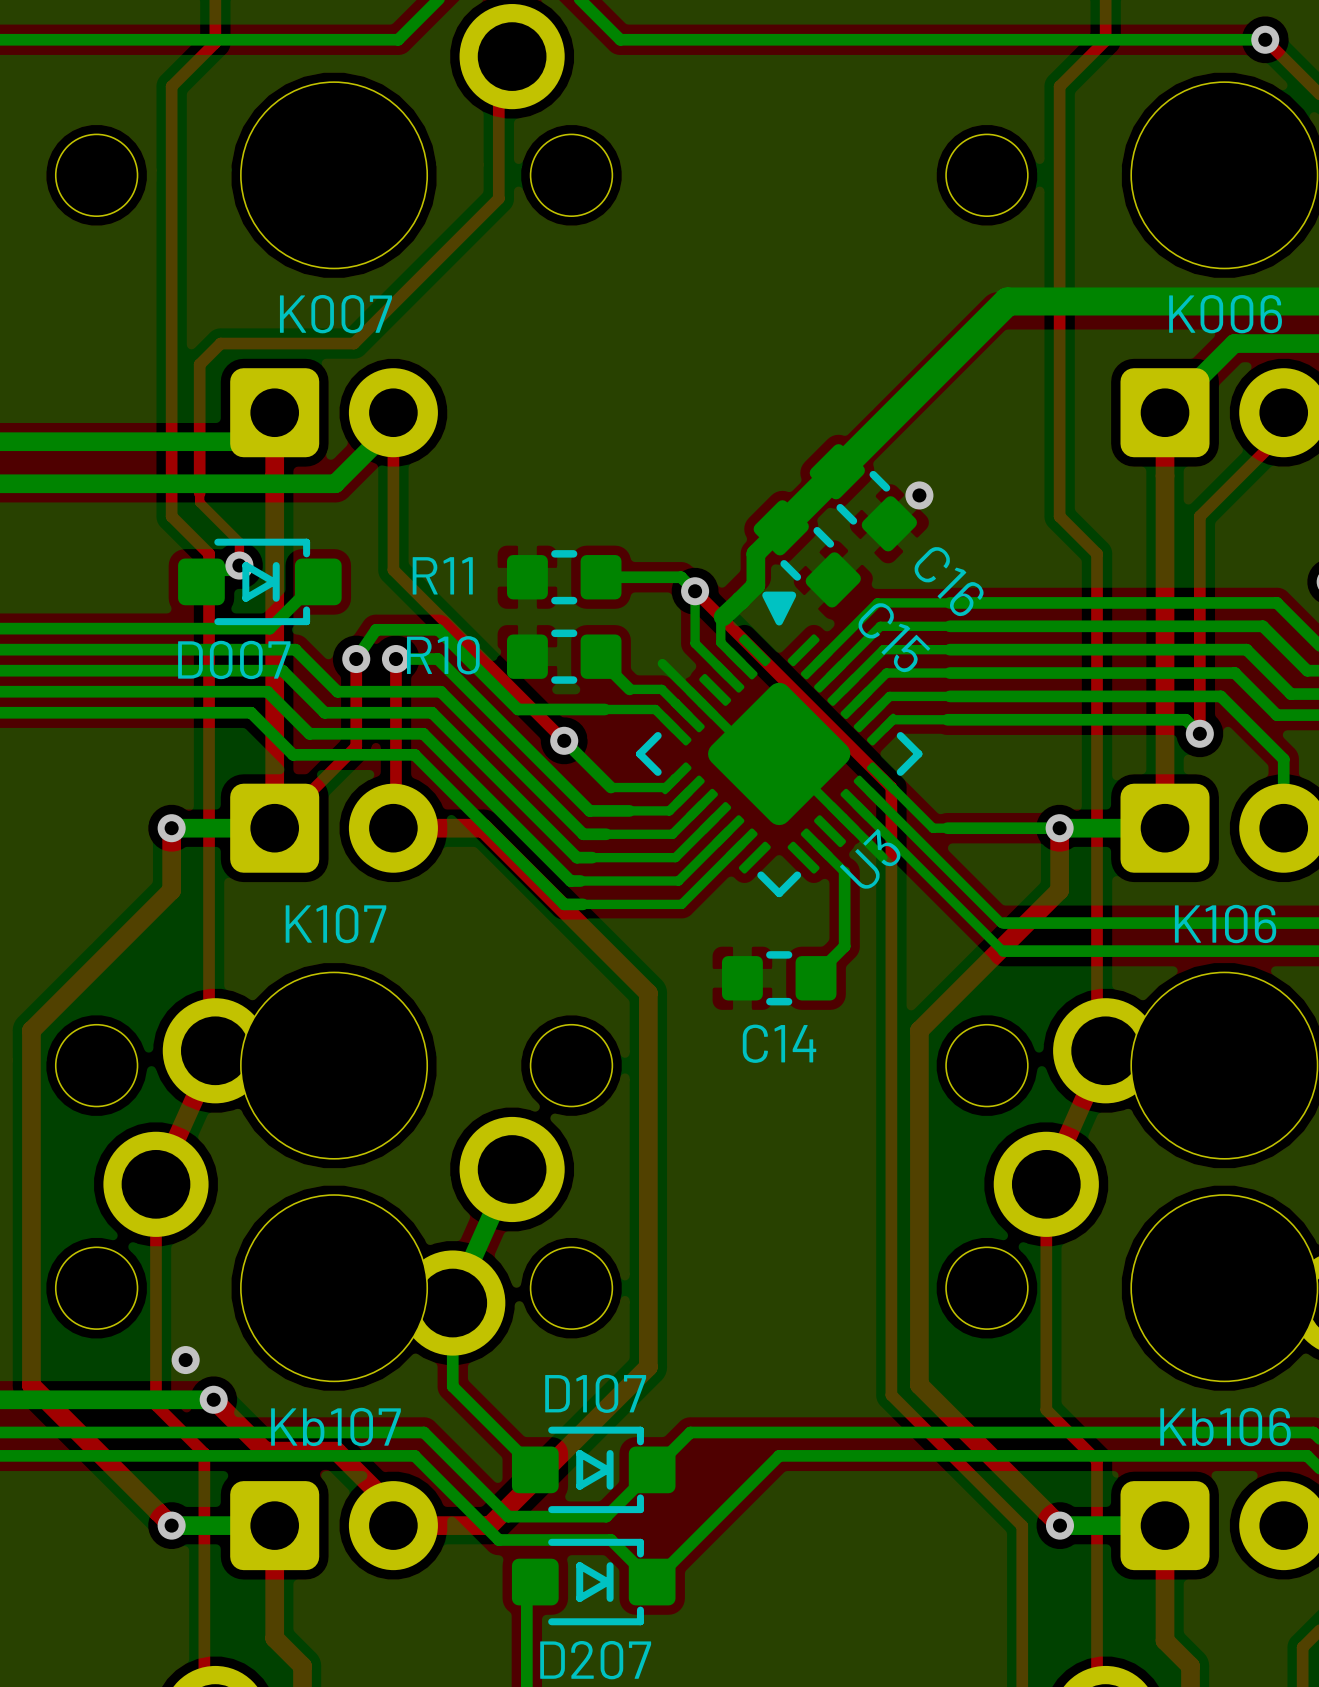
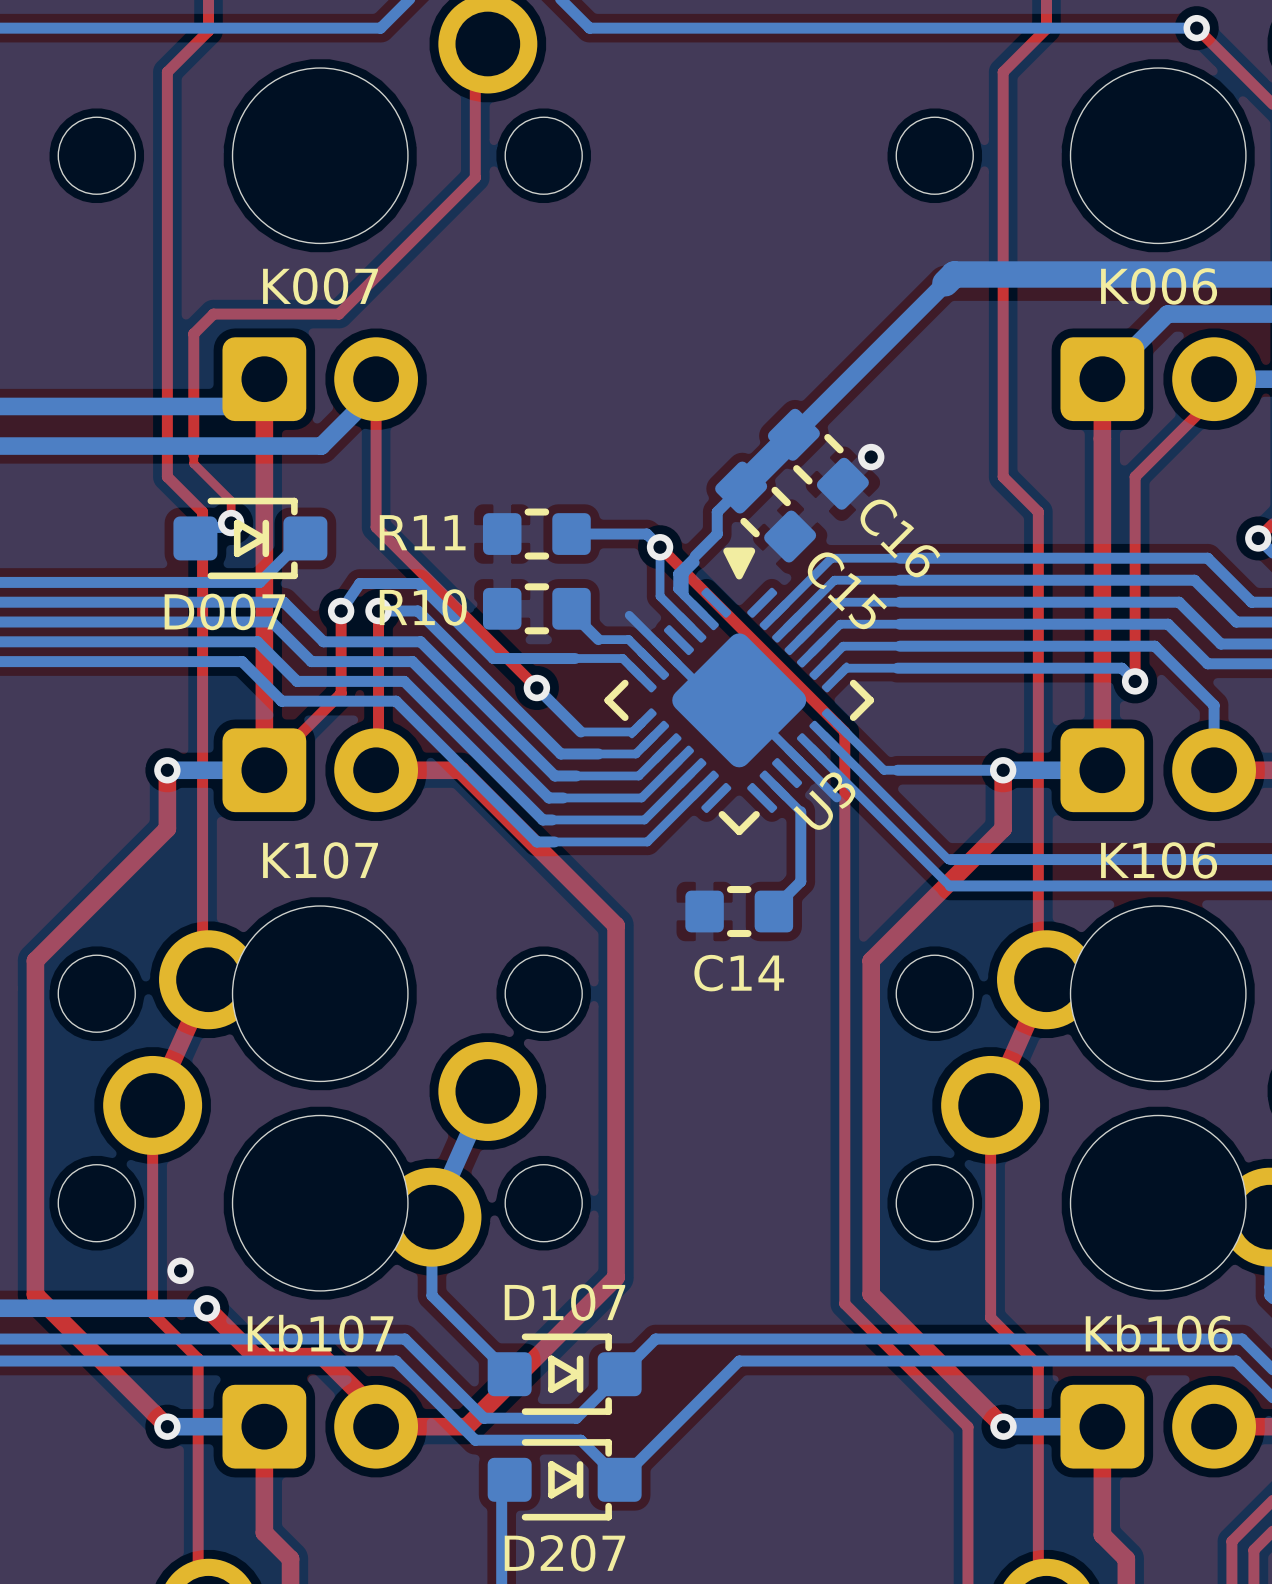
bottom track width: thick (998, 310) (837, 471) -> thin (945, 283) (793, 434)
bottom track width: thick (781, 528) (755, 553) (755, 577) -> thin (741, 488) (717, 512) (717, 534)
bottom track: (755, 577) (755, 585) (723, 616) -> (717, 534) (677, 573) (677, 589) (684, 595)

